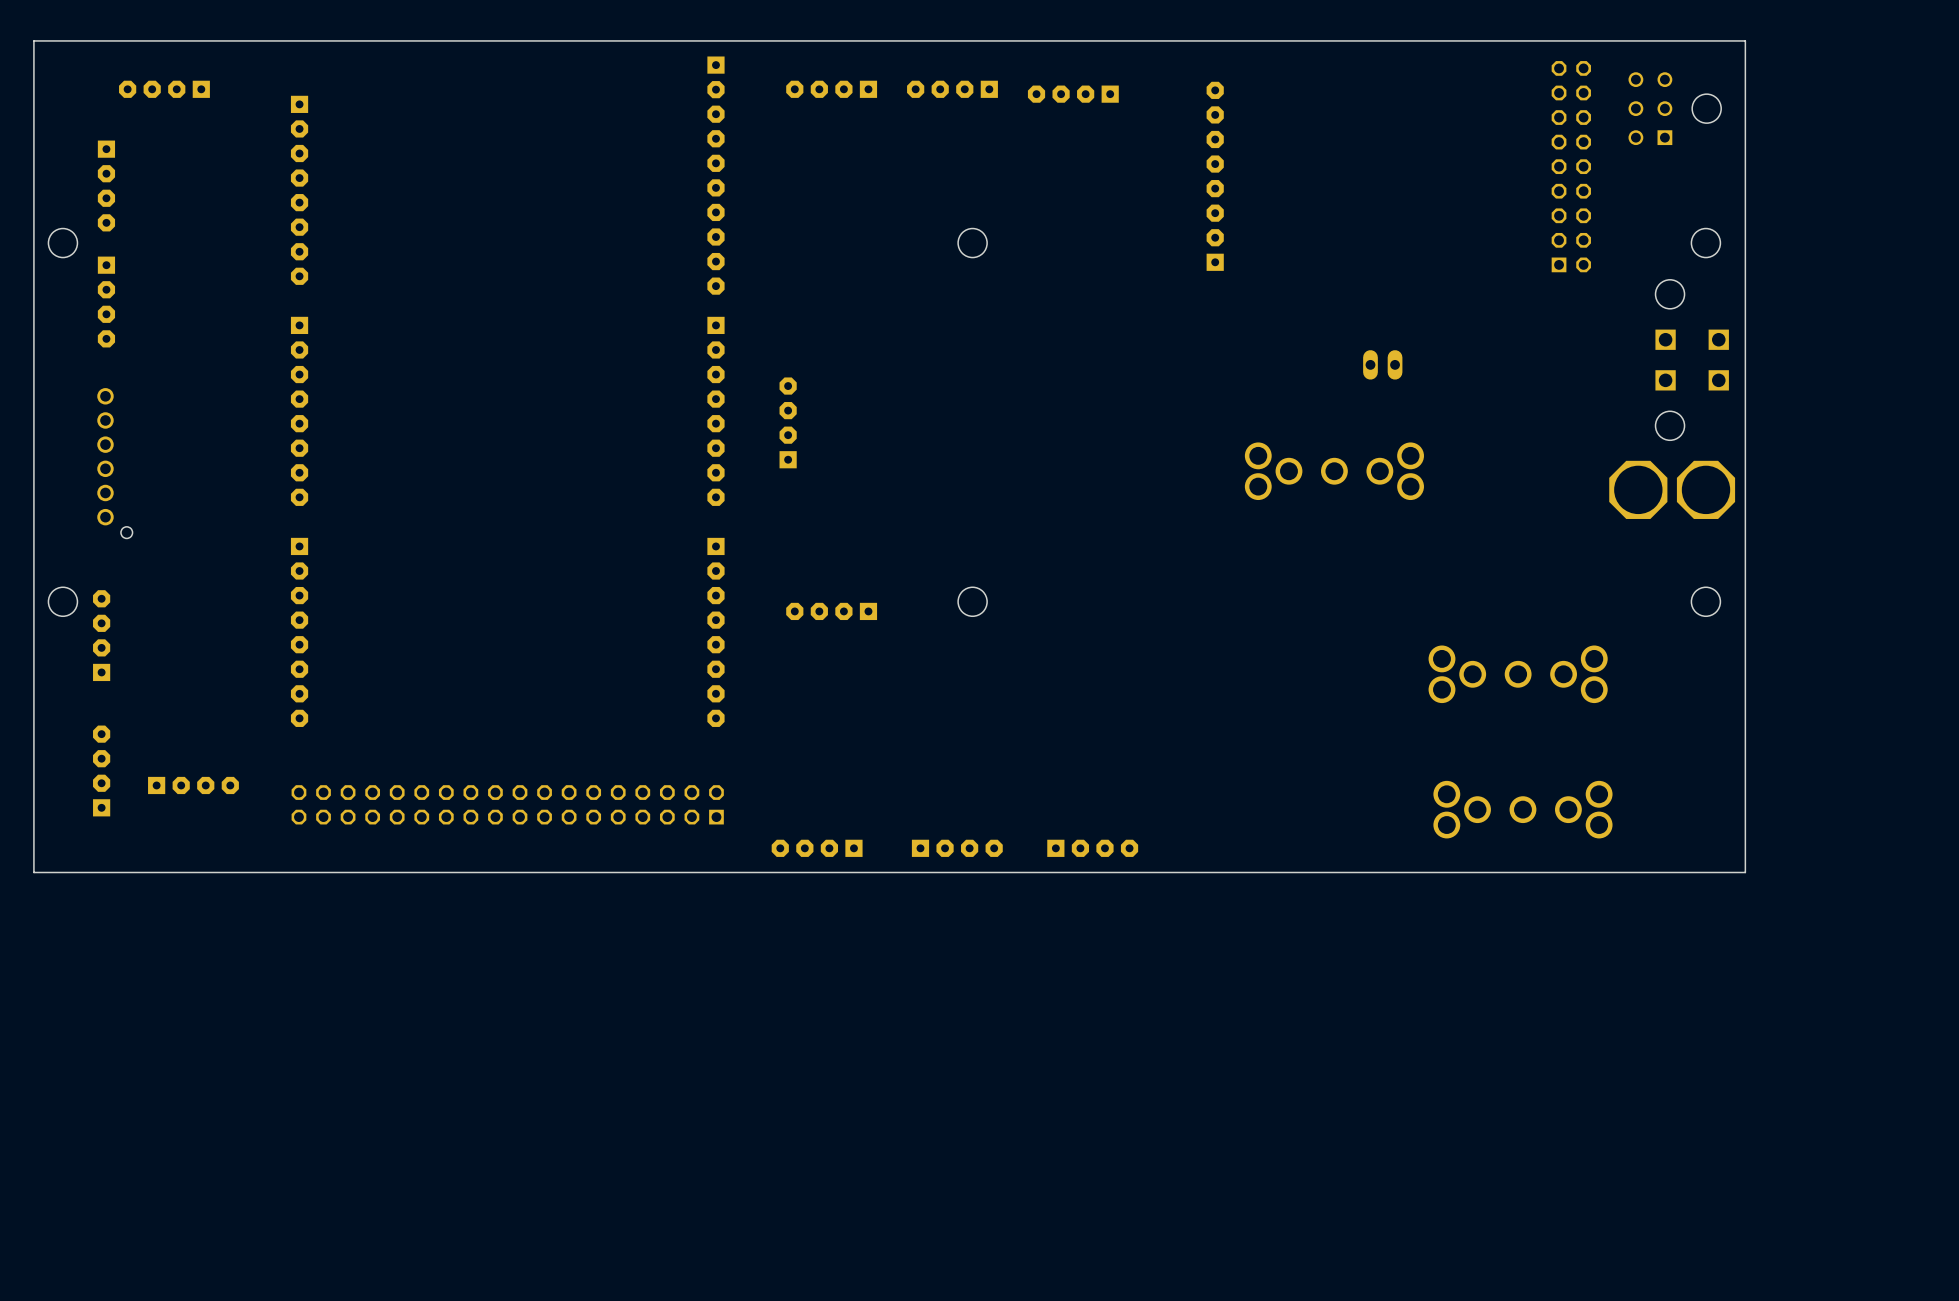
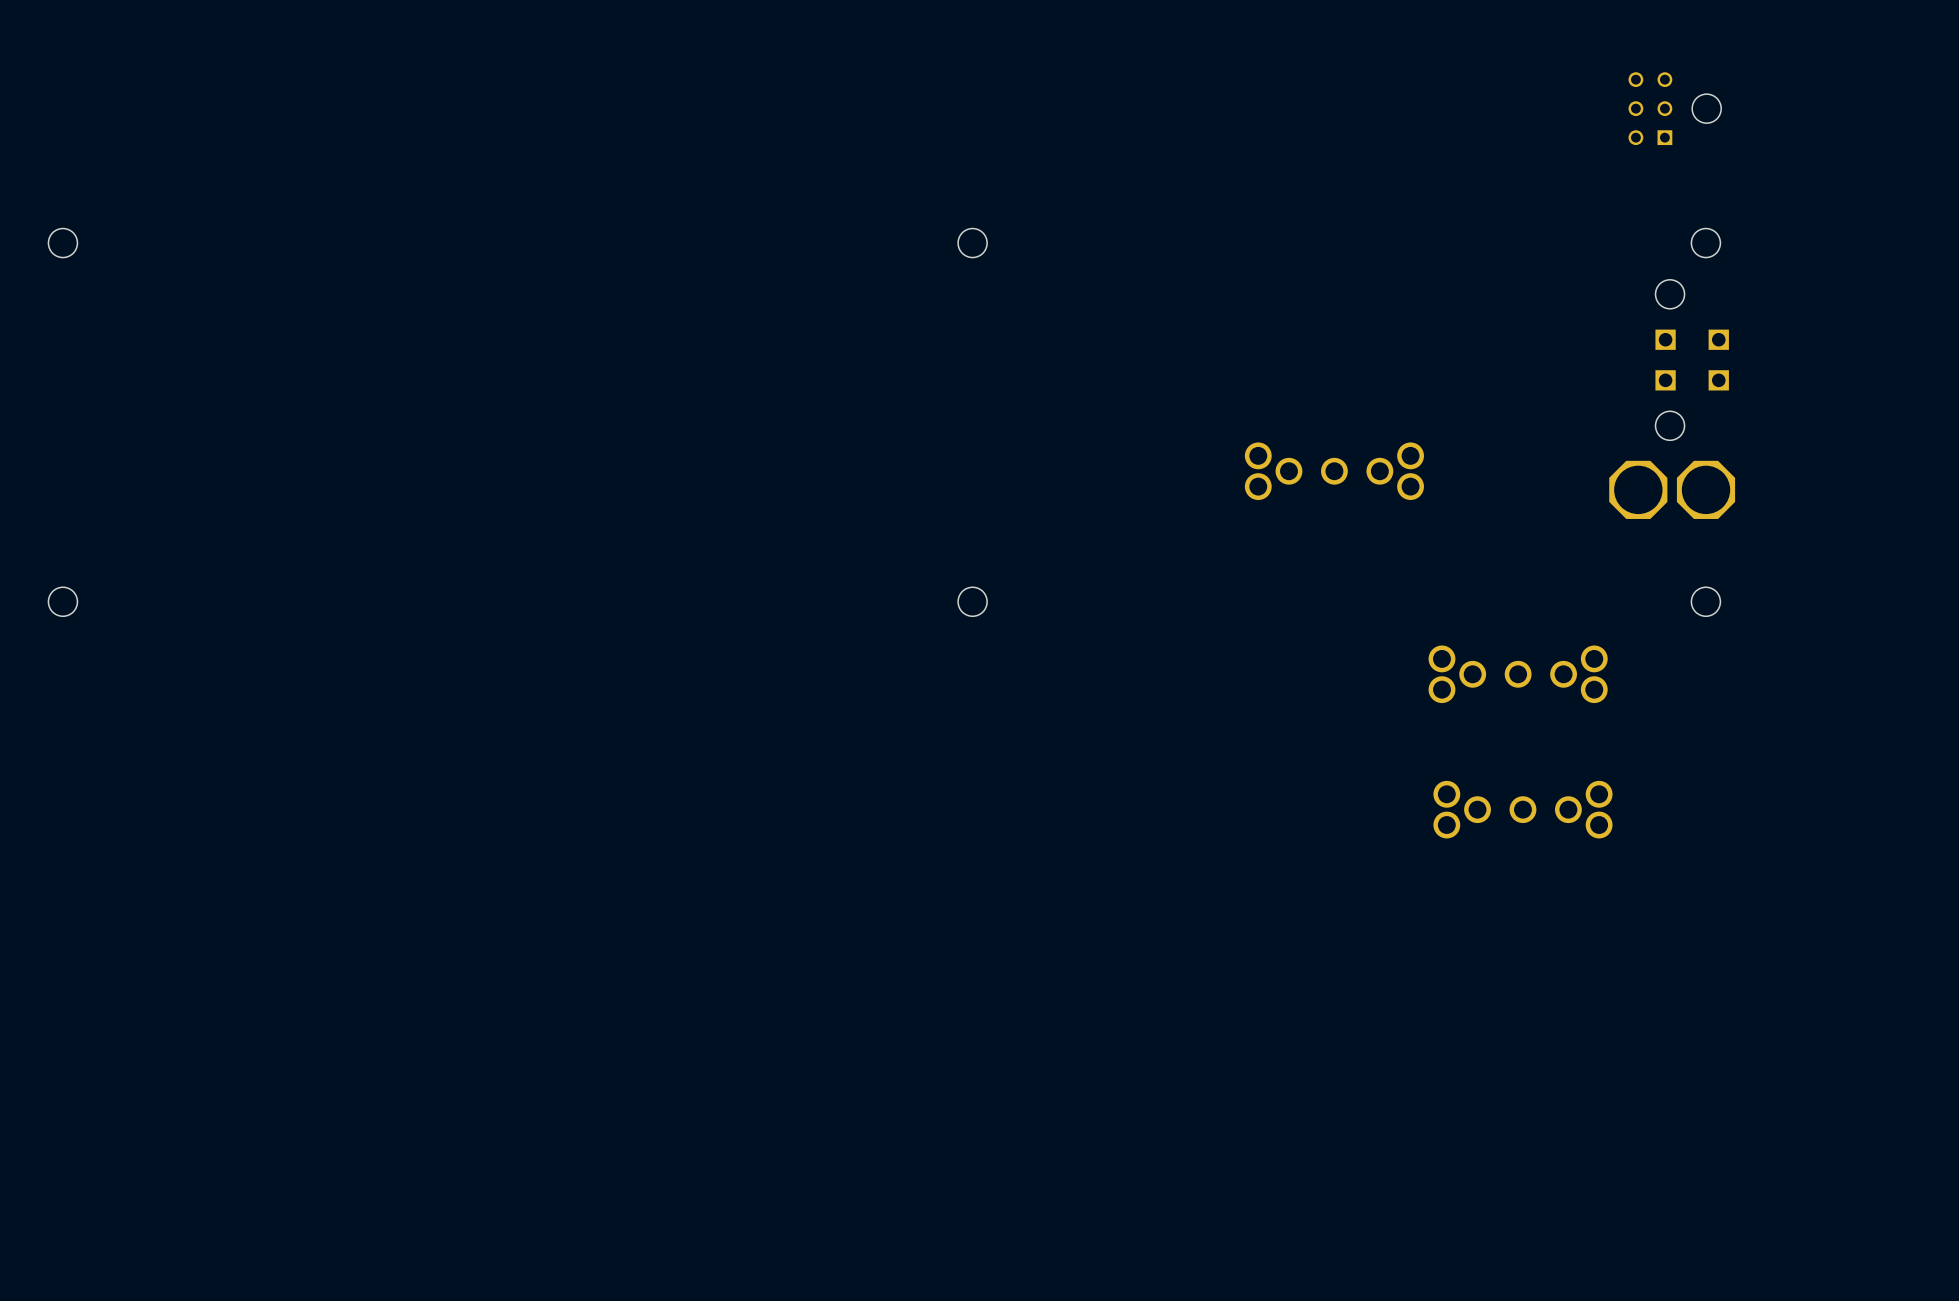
board edge: (1745, 40) (33, 40) (33, 872) (1745, 872) (1745, 40) -> none
part: (164, 89) -> none
part: (831, 89) -> none
part: (952, 89) -> none
part: (1073, 94) -> none
part: (1571, 166) -> none
part: (715, 175) -> none
part: (1215, 176) -> none
part: (106, 186) -> none
part: (299, 190) -> none
part: (106, 302) -> none
part: (1382, 364) -> none
part: (299, 411) -> none
part: (715, 411) -> none
part: (788, 422) -> none
part: (114, 463) -> none
part: (831, 611) -> none
part: (299, 632) -> none
part: (715, 632) -> none
part: (101, 635) -> none
part: (101, 770) -> none
part: (193, 785) -> none
part: (507, 804) -> none
part: (817, 848) -> none
part: (957, 848) -> none
part: (1092, 848) -> none

